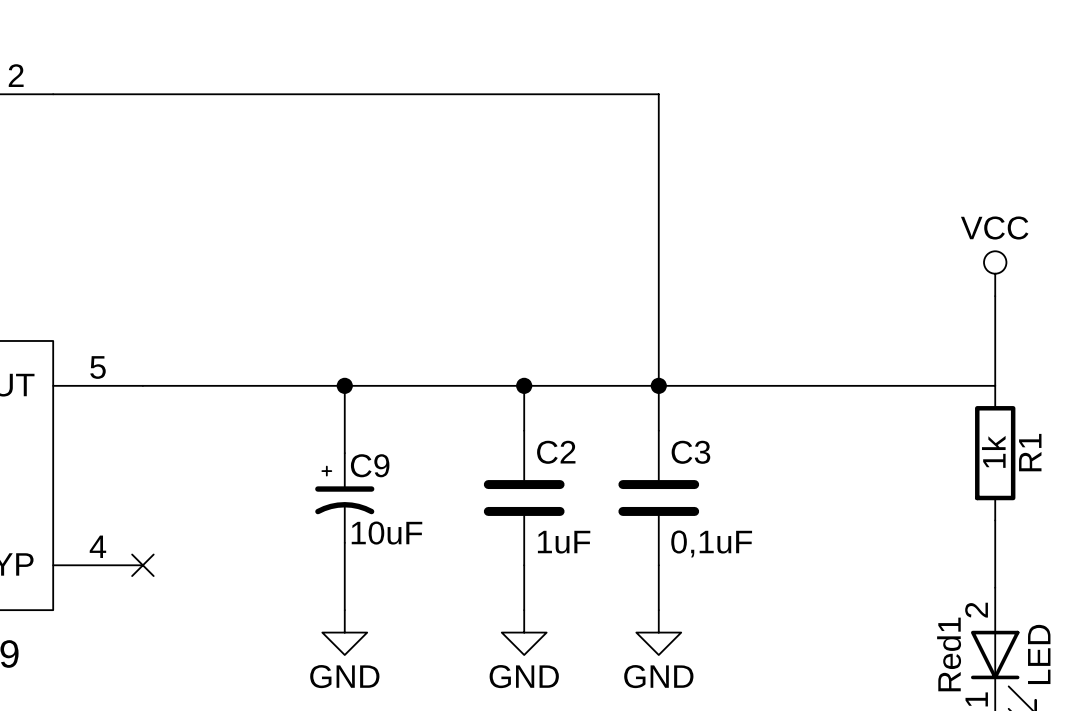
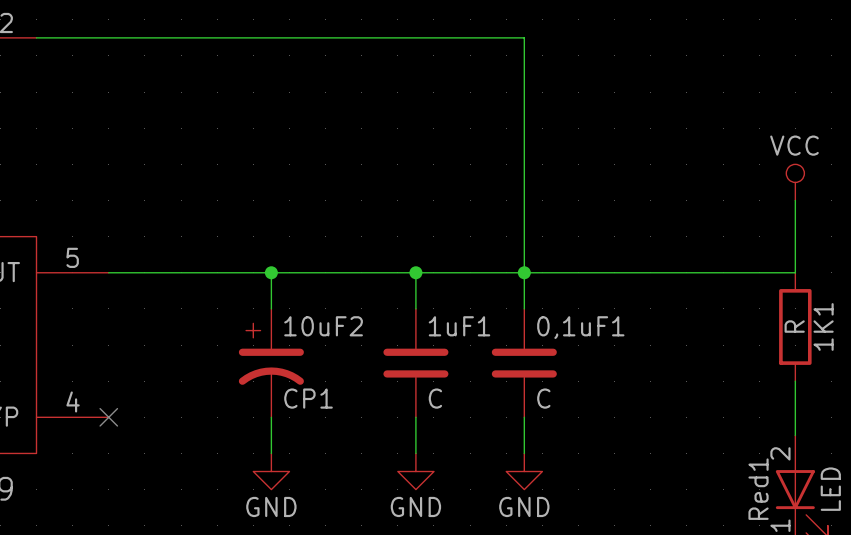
R1 value: 1k (993, 451) -> R (794, 326)
C2 name: C2 (556, 452) -> 1uF1 (459, 326)
C3 name: C3 (690, 452) -> 0,1uF1 (580, 327)
R1 name: R1 (1030, 452) -> 1K1 (823, 326)
C9: 10uF (344, 498) -> none
10uF2: none -> CP1 (271, 363)
C2 value: 1uF (564, 542) -> C (435, 398)
C3 value: 0,1uF (711, 543) -> C (543, 398)

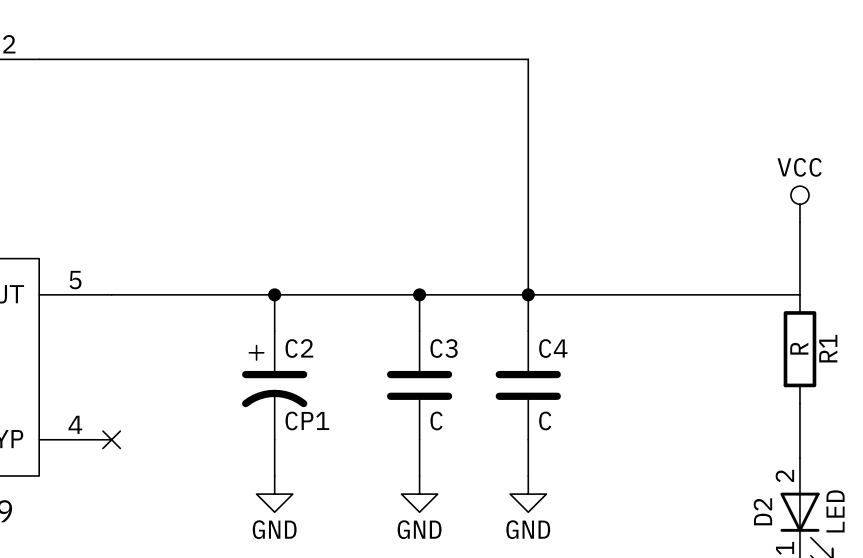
10uF2 name: 10uF2 (323, 326) -> C2 (299, 348)
1uF1 name: 1uF1 (459, 326) -> C3 (444, 348)
1K1 name: 1K1 (823, 326) -> R1 (828, 348)
0,1uF1 name: 0,1uF1 (580, 327) -> C4 (553, 348)
Red1 name: Red1 (758, 489) -> D2 (762, 511)

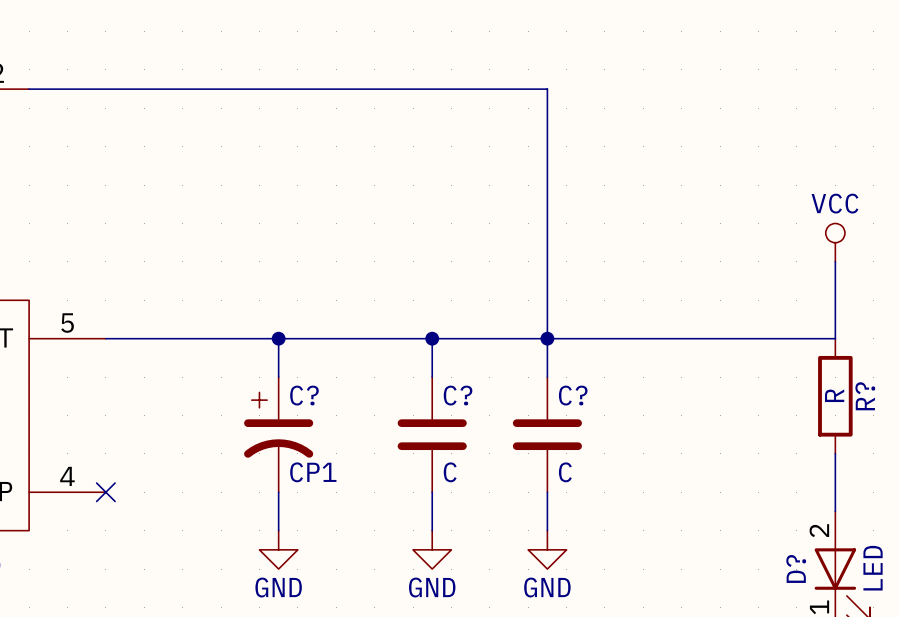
C2 name: C2 (299, 348) -> C? (304, 395)
C3 name: C3 (444, 348) -> C? (458, 395)
C4 name: C4 (553, 348) -> C? (573, 395)
R1 name: R1 (828, 348) -> R? (865, 396)
D2 name: D2 (762, 511) -> D? (796, 568)

